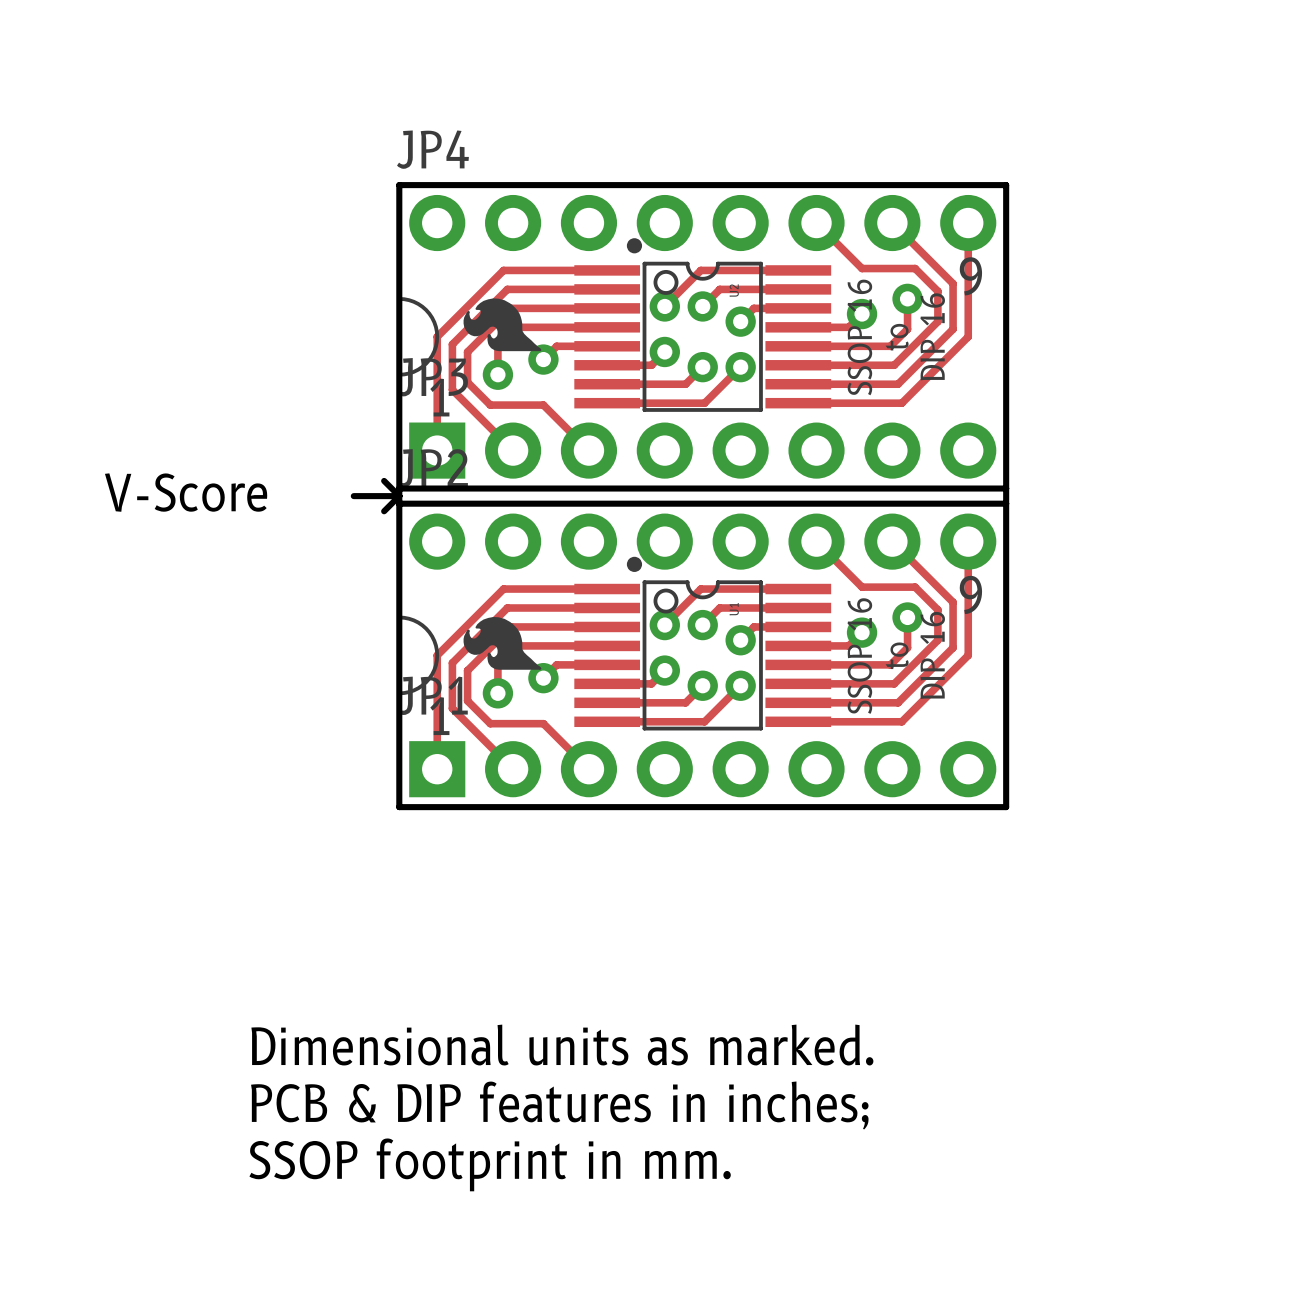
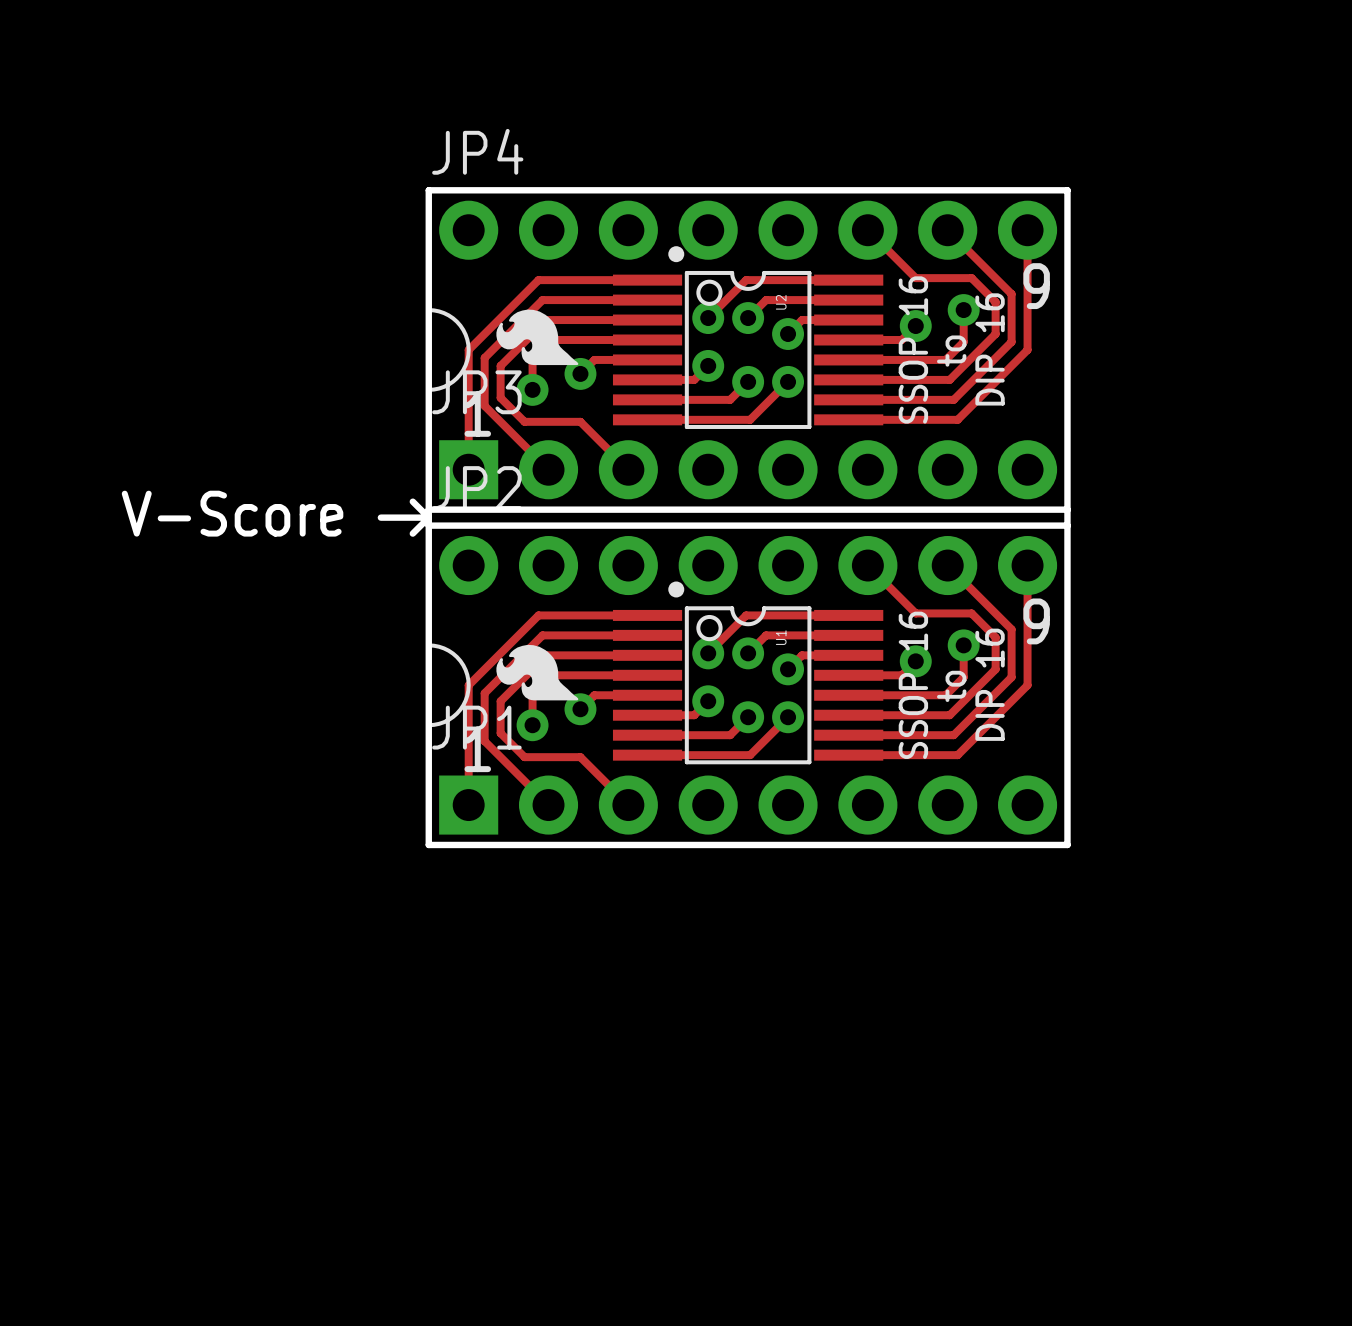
text: Dimensional units as marked. (562, 1045) -> none
text: PCB & DIP features in inches; (559, 1105) -> none
text: SSOP footprint in mm. (490, 1164) -> none

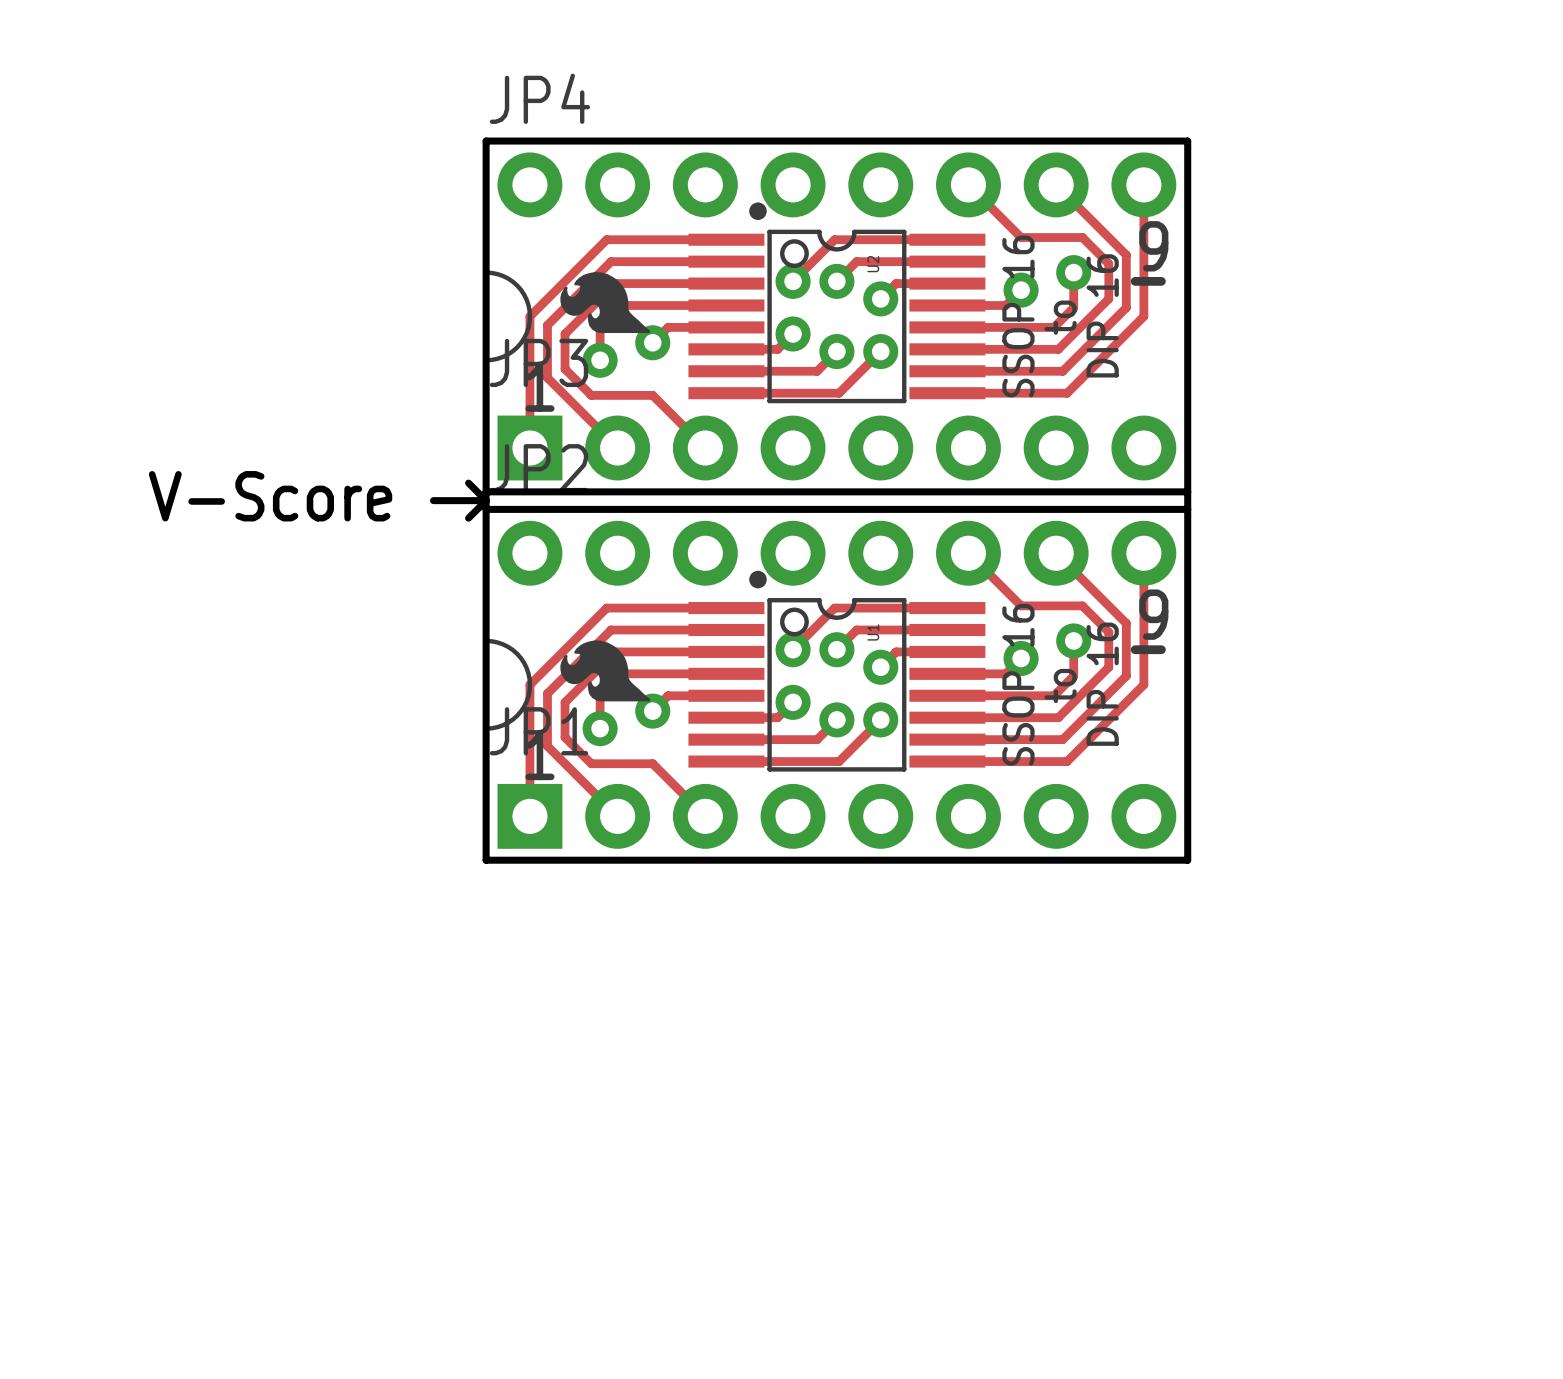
line: none -> (1135, 281) (1161, 281)
line: none -> (1135, 649) (1161, 649)

